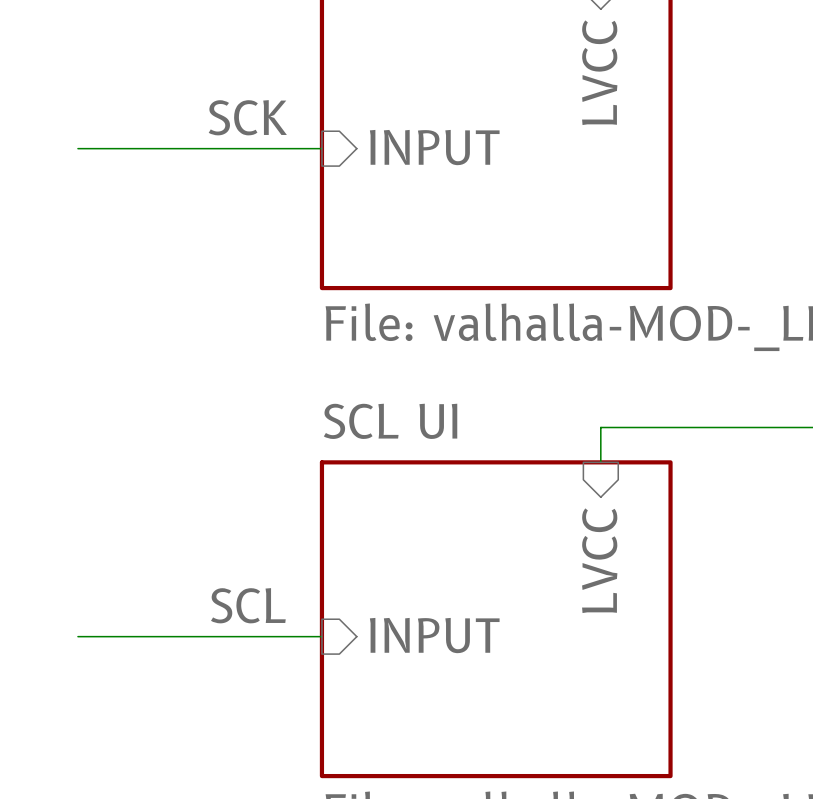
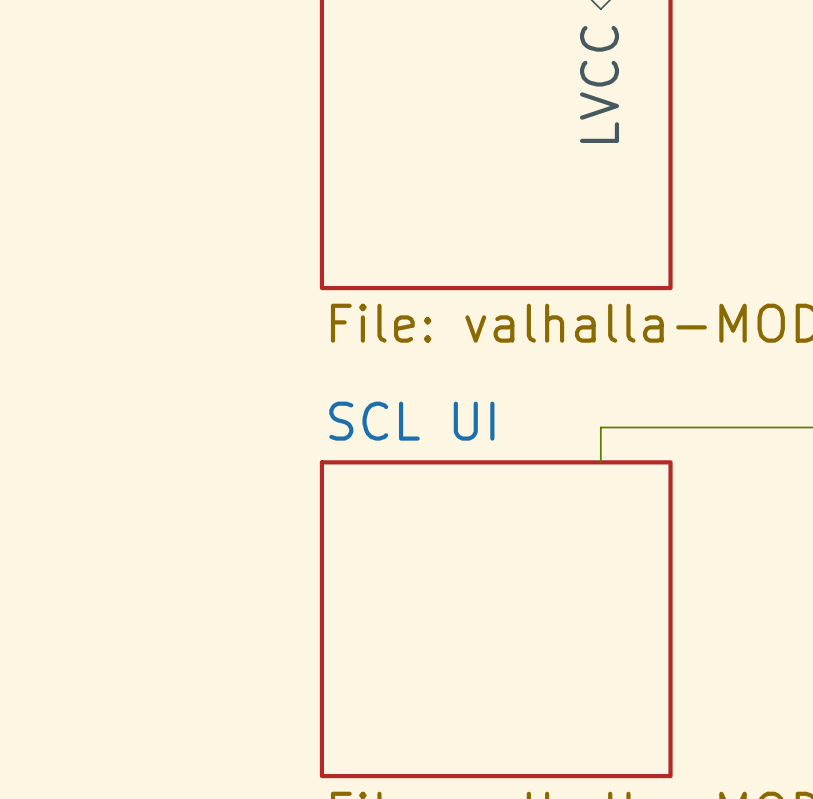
label: SCK (247, 117) -> none
sheet pin: INPUT (434, 147) -> none
wire: (77, 148) (321, 148) -> none
sheet pin: LVCC (599, 560) -> none
label: SCL (248, 605) -> none
sheet pin: INPUT (434, 635) -> none
wire: (77, 636) (321, 636) -> none

